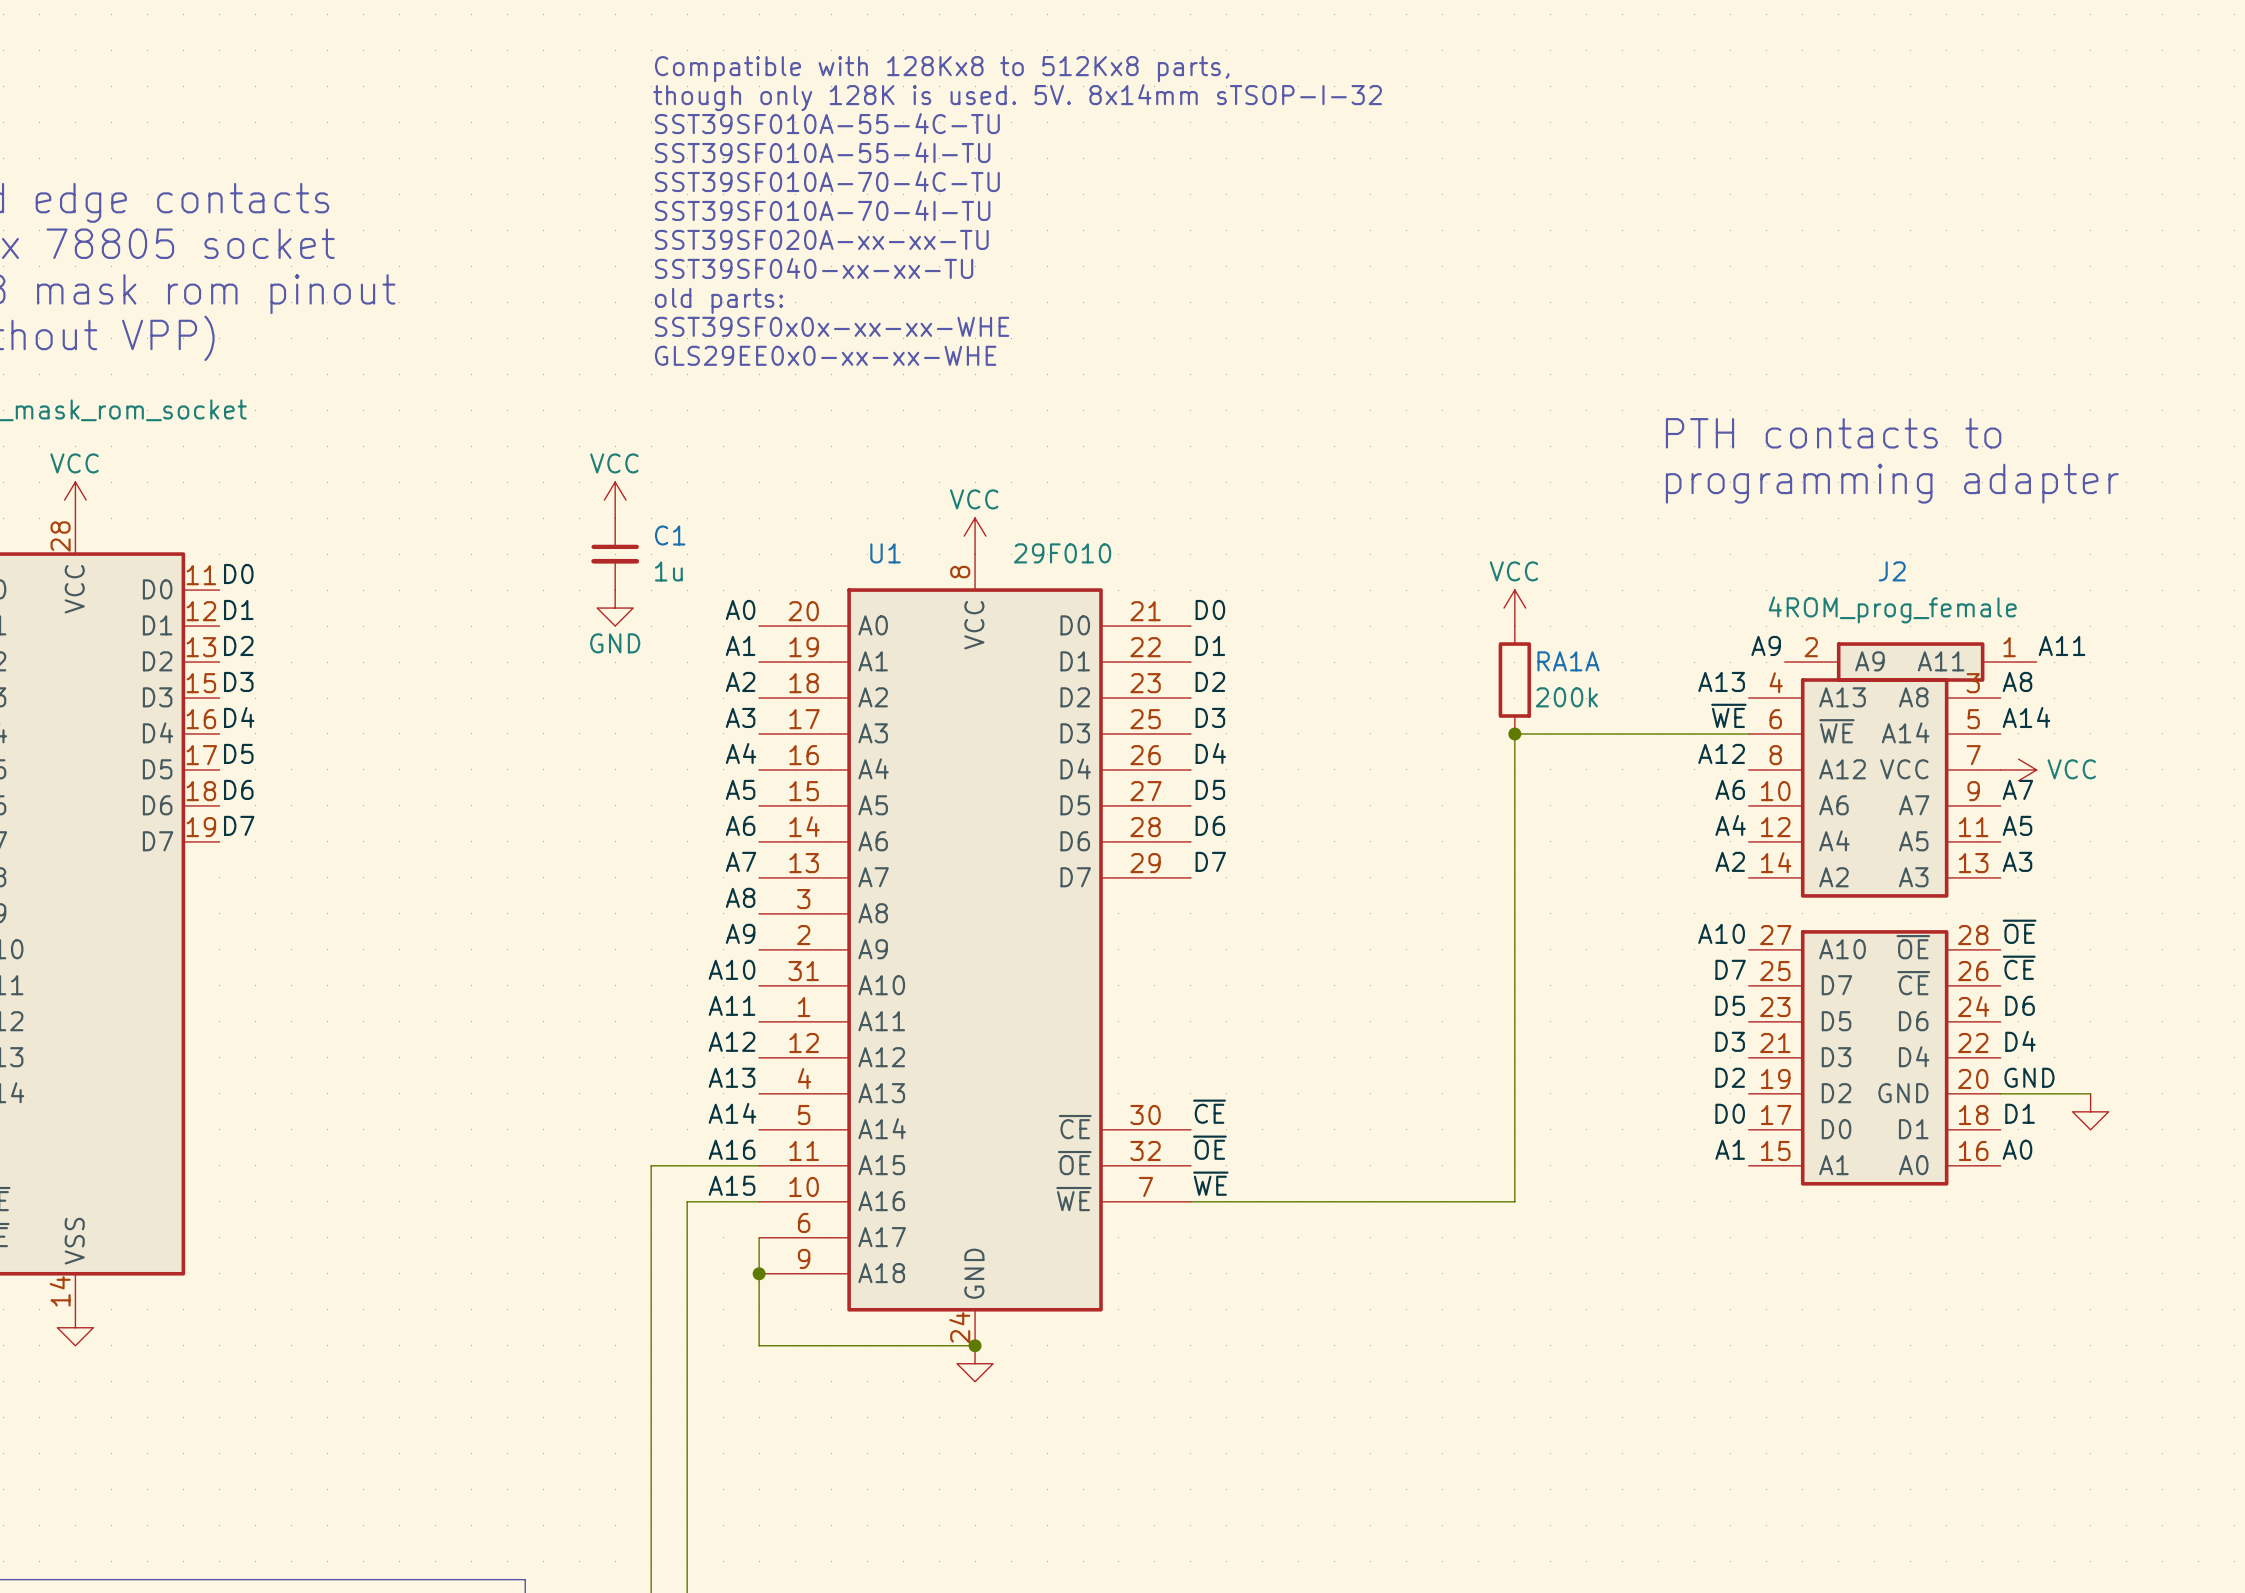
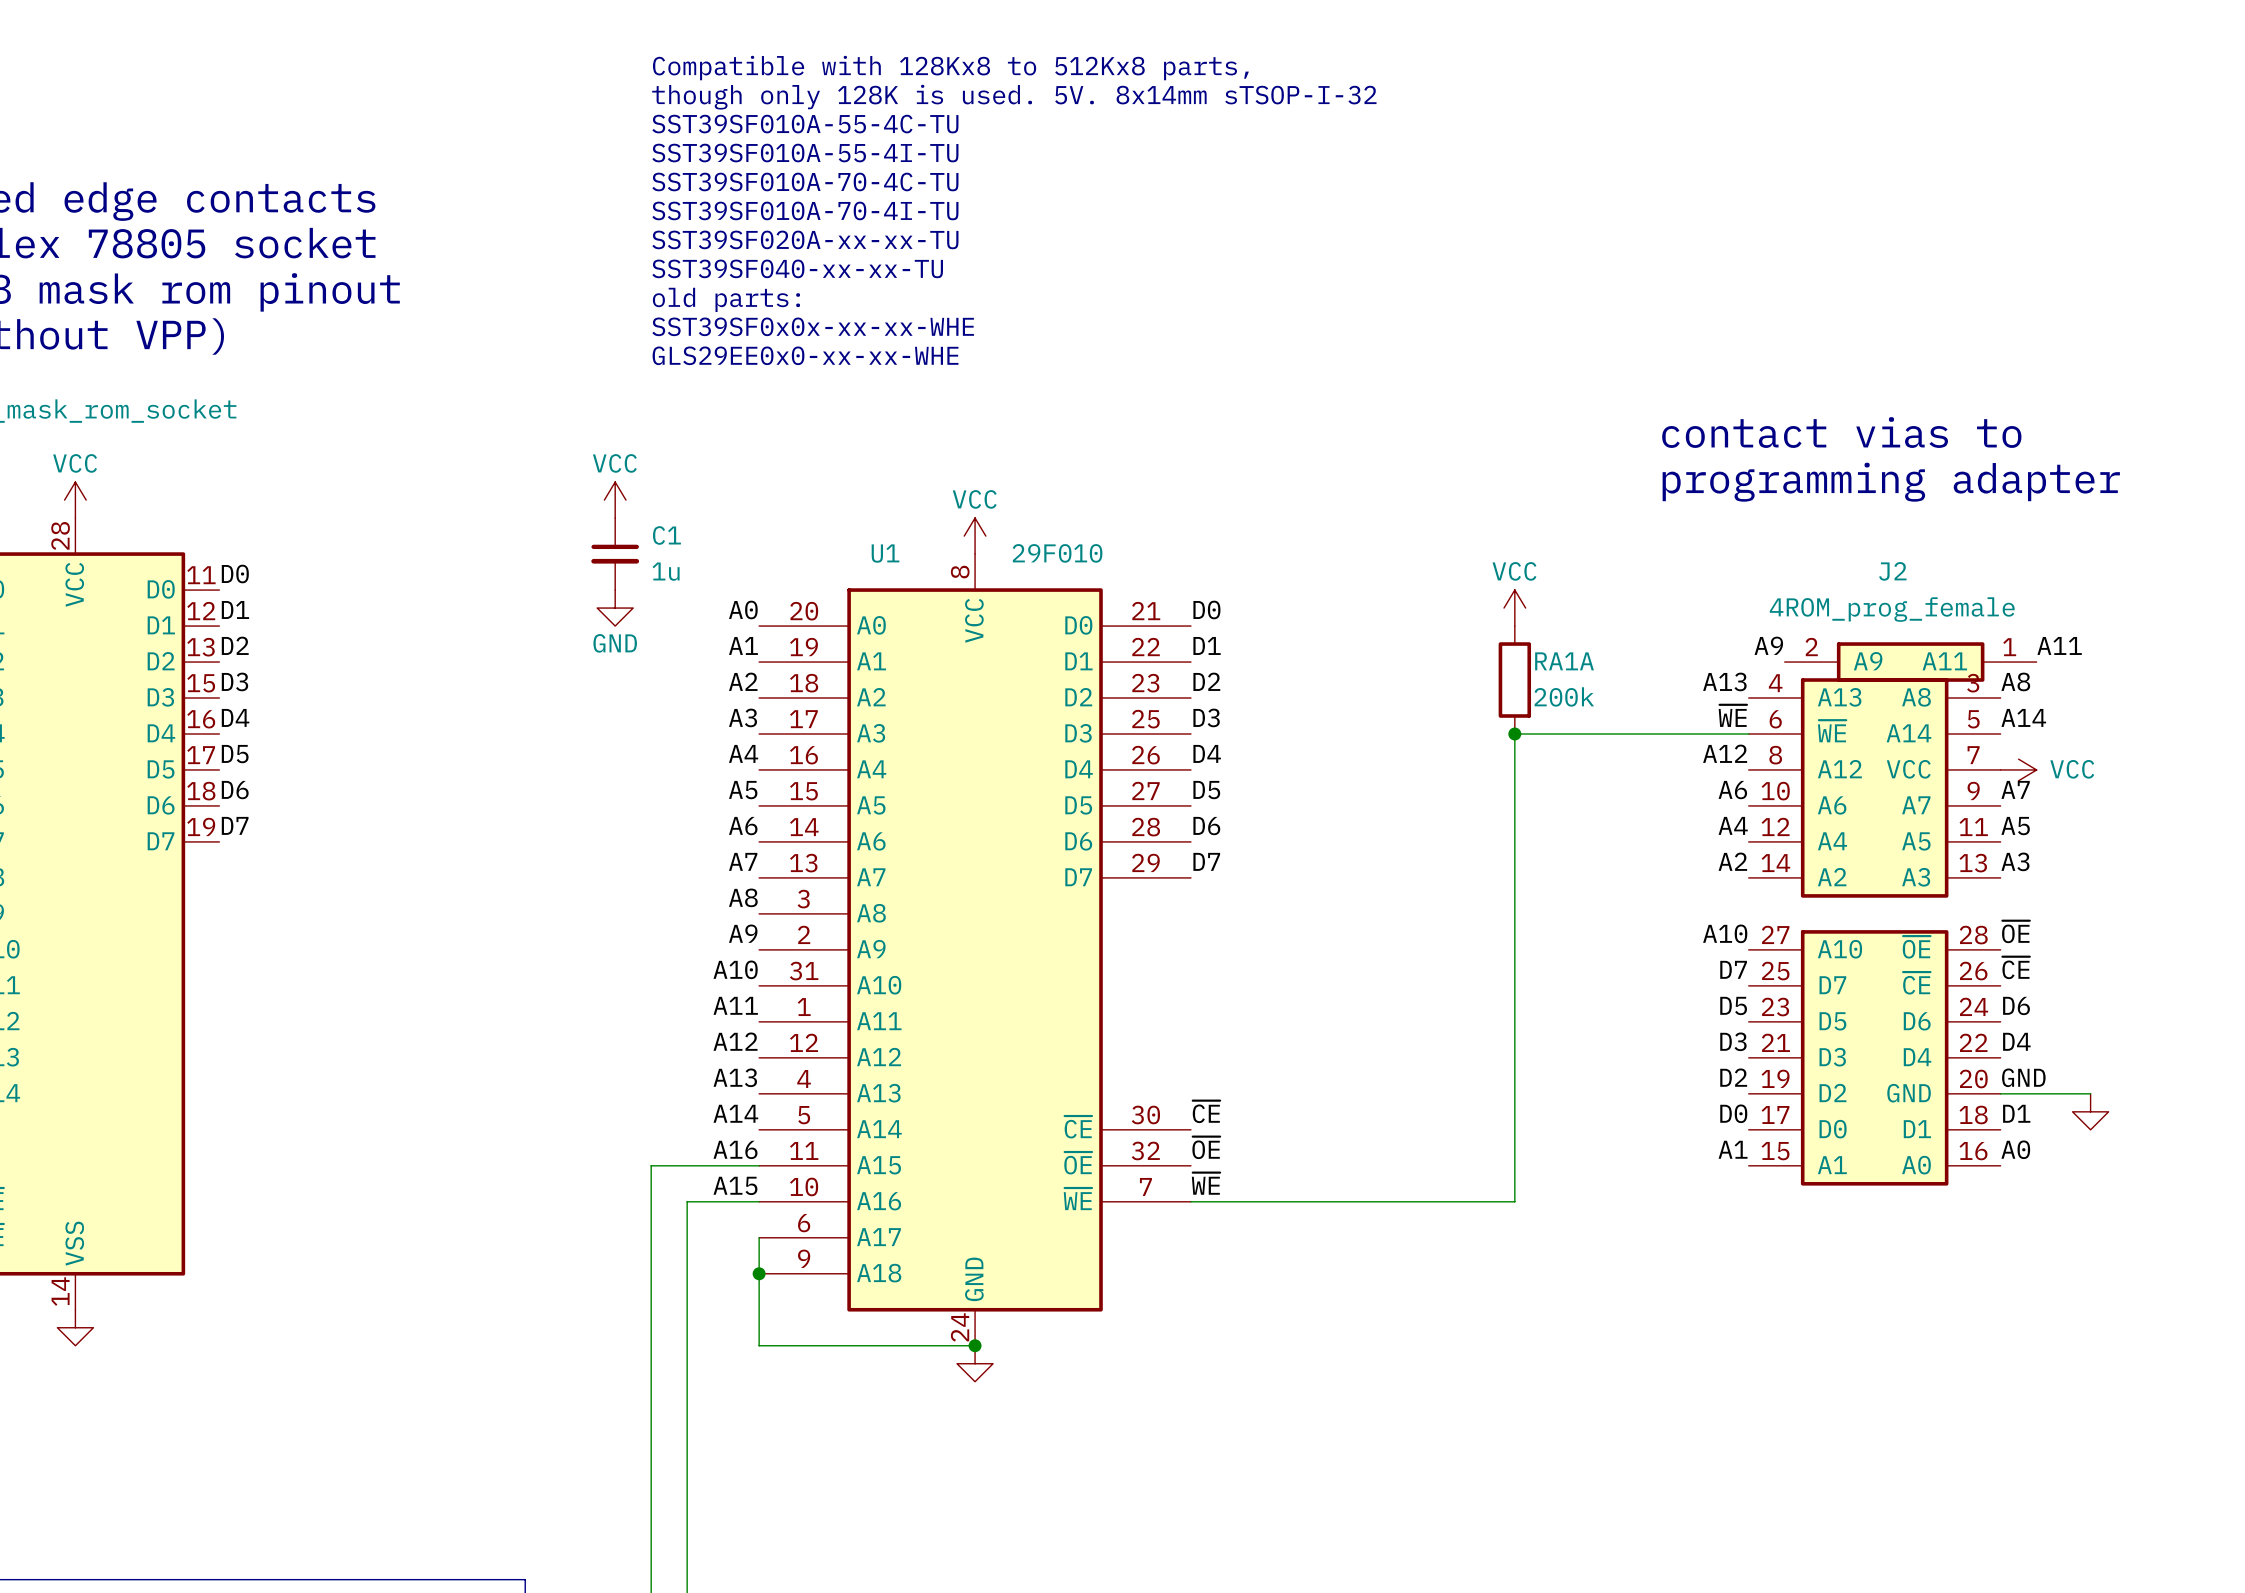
text: PTH contacts to (1833, 433) -> contact vias to (1841, 432)

